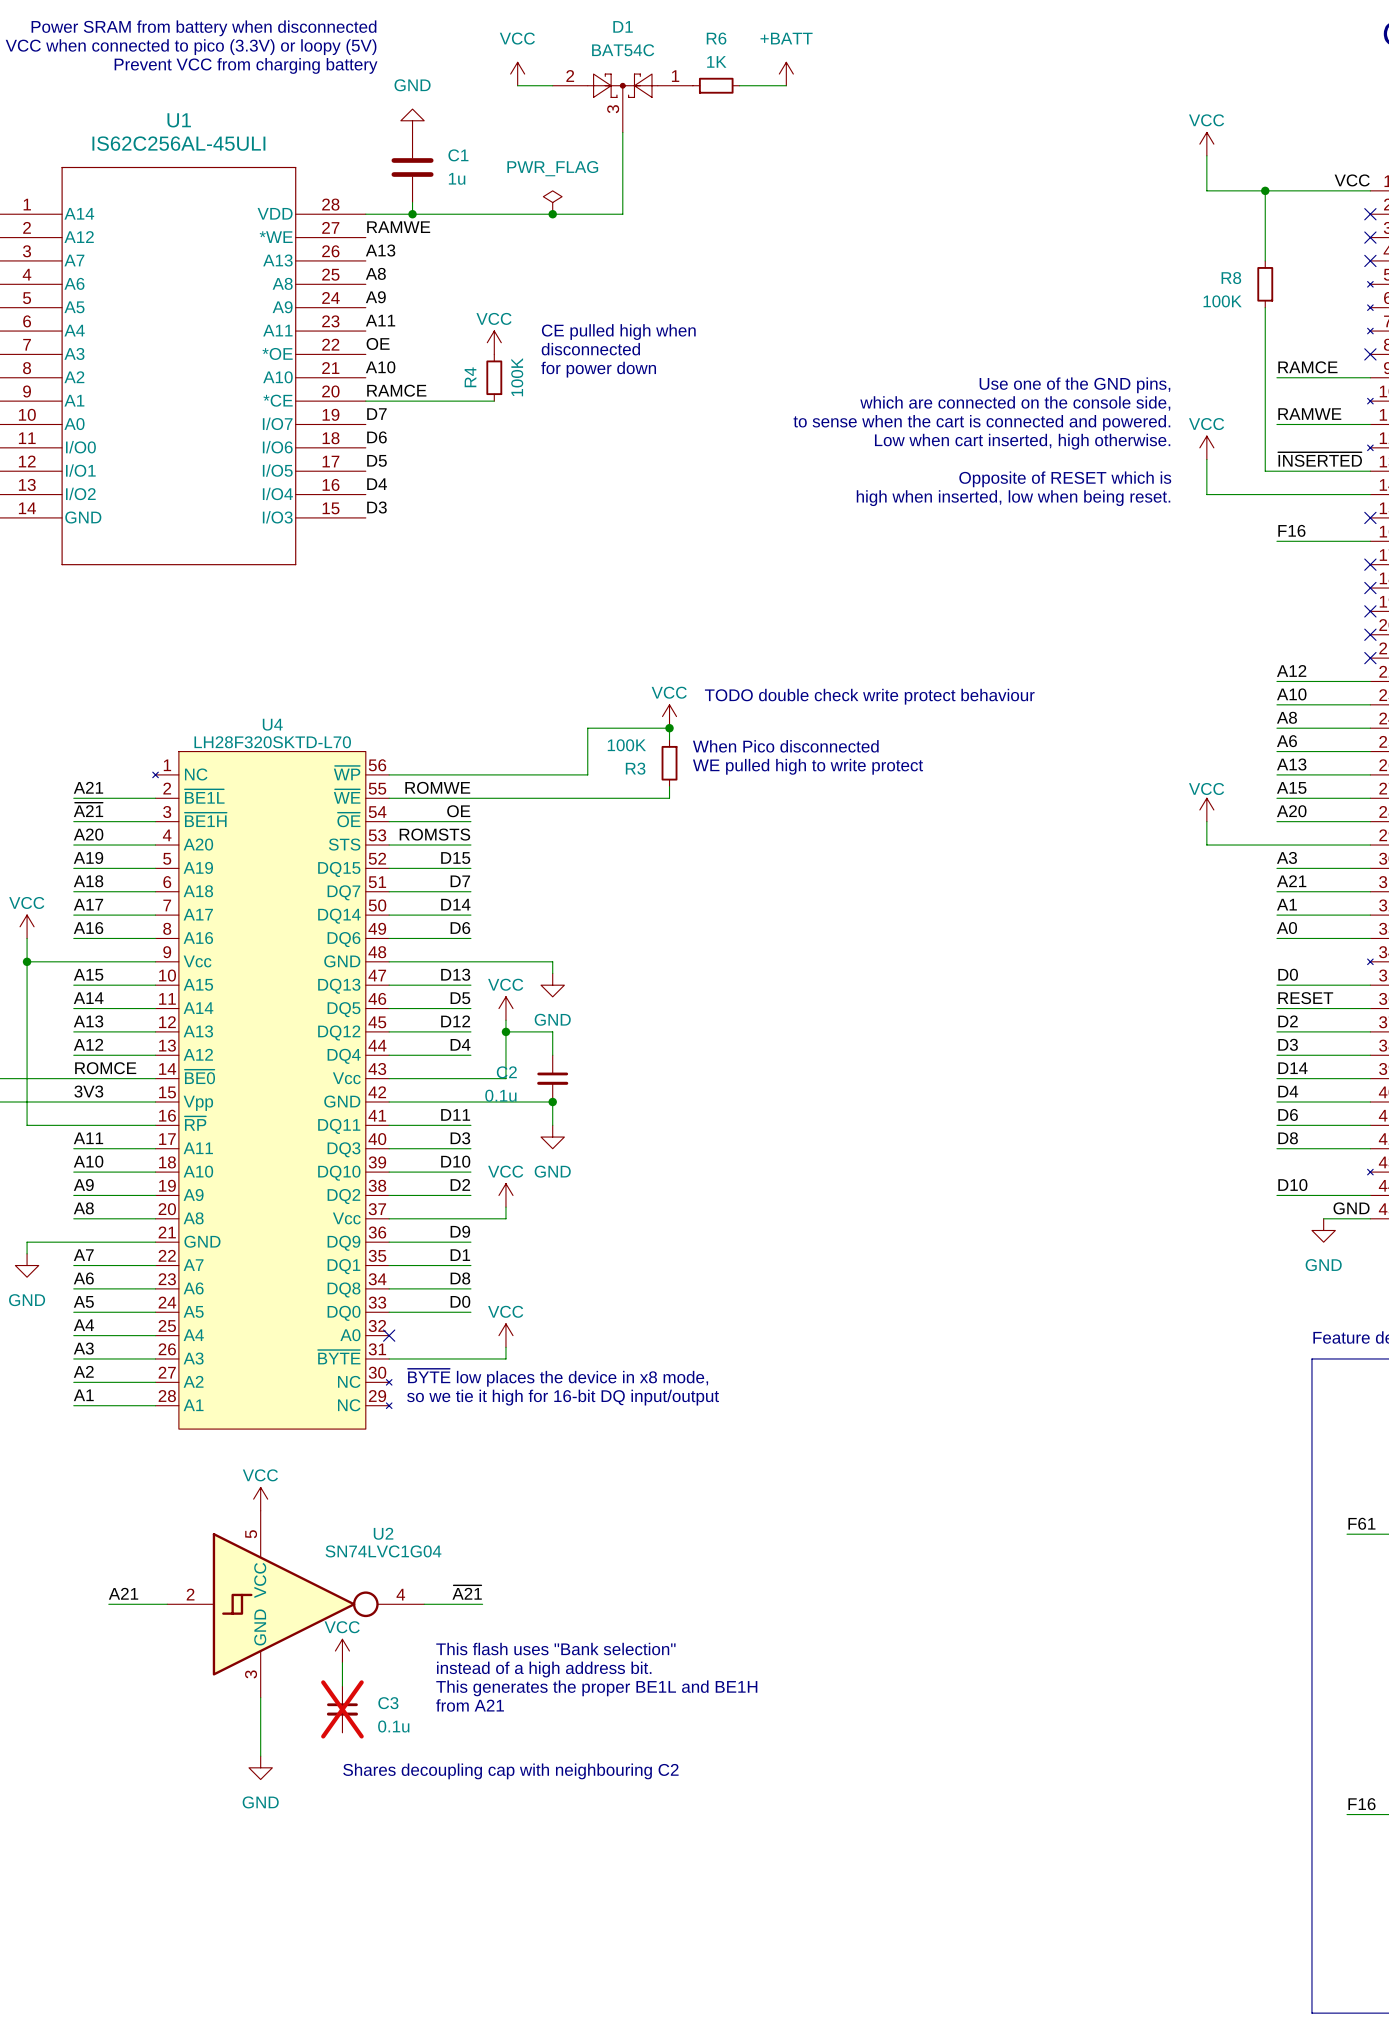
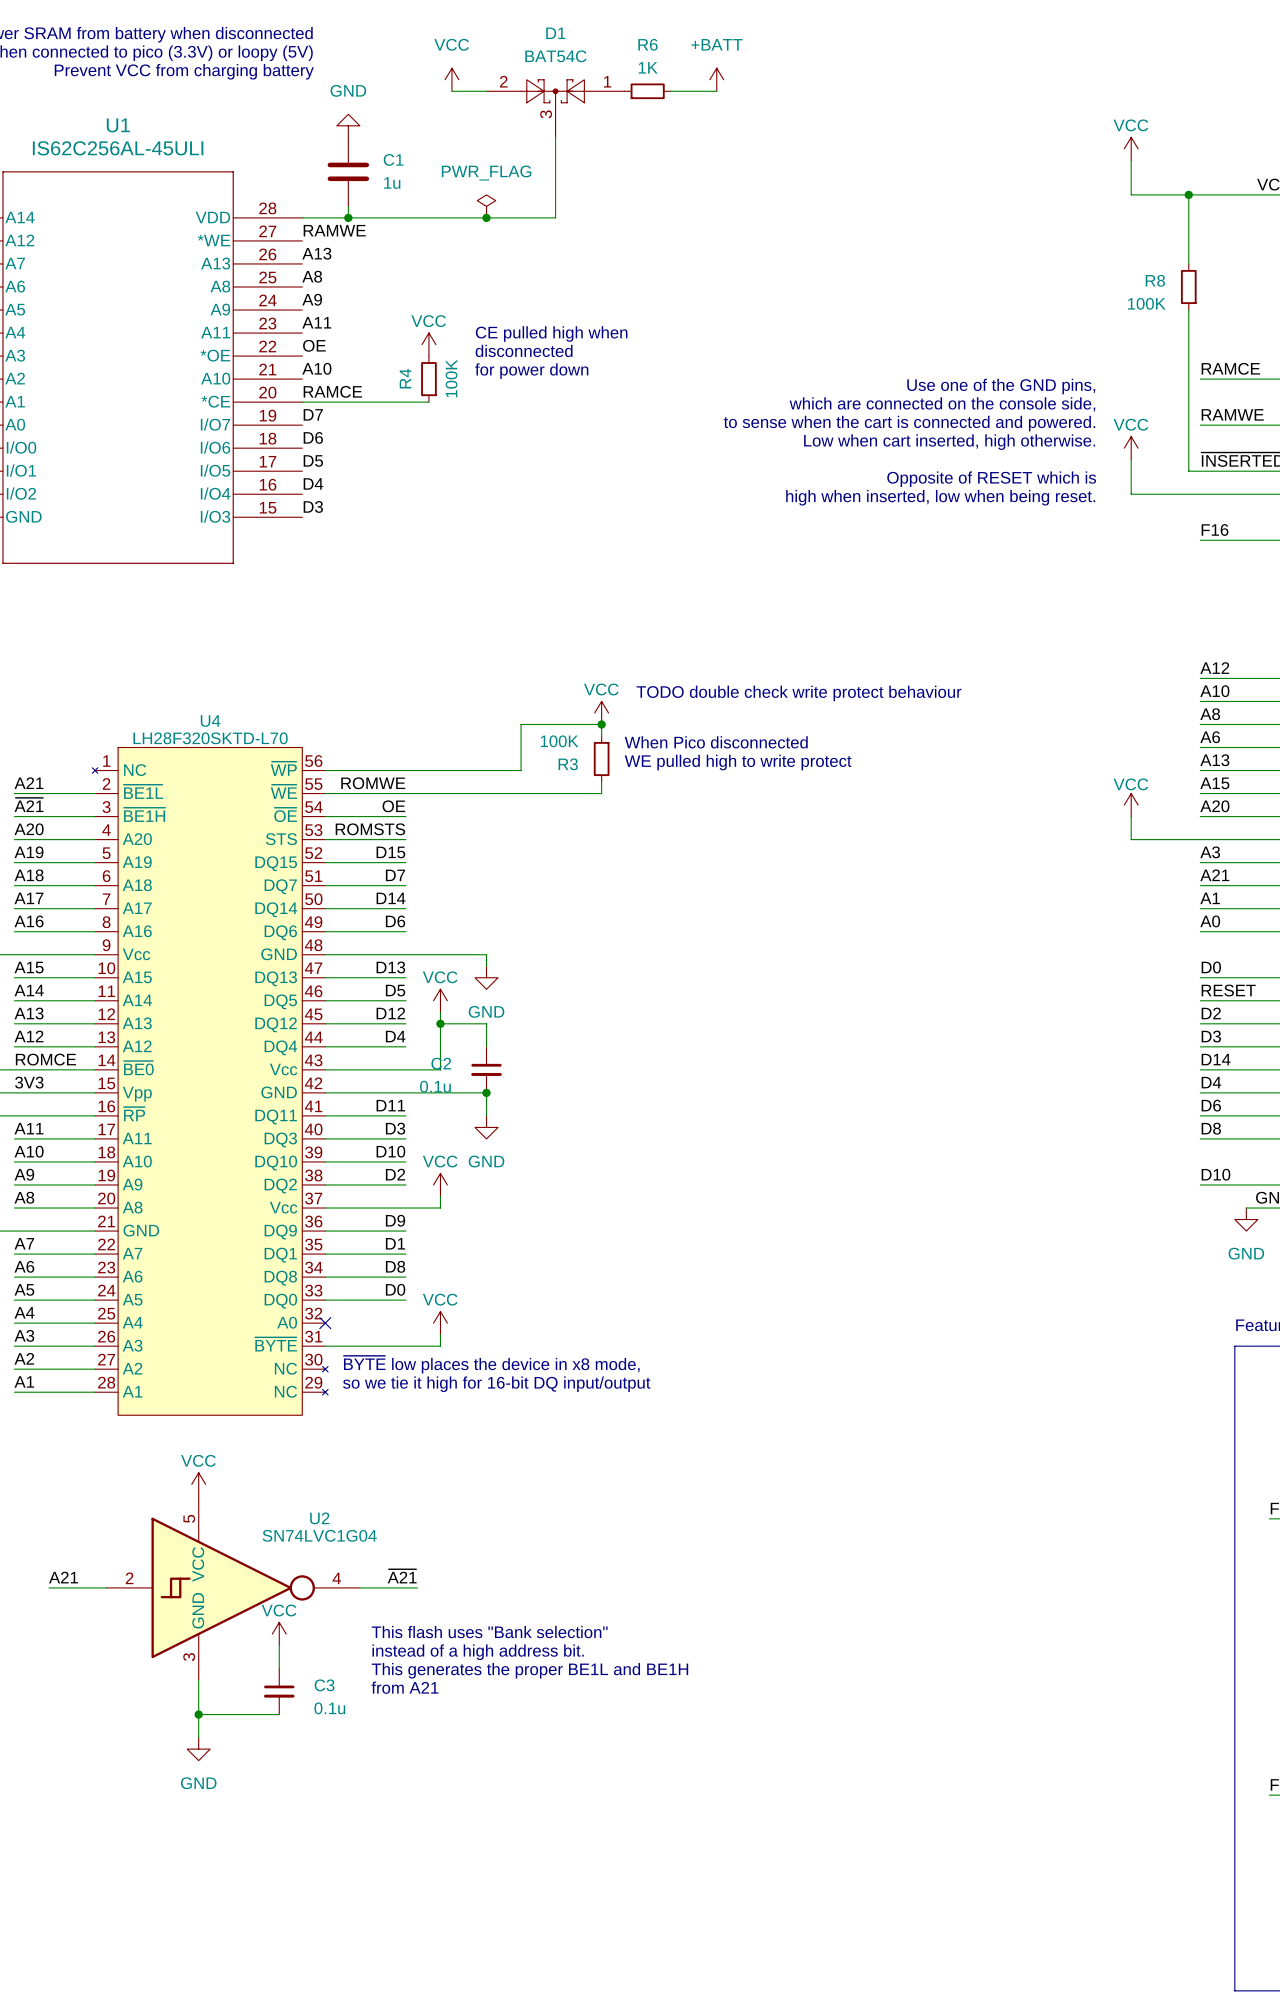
C3 do-not-place cross: (342, 1709) -> none
wire: none -> (198, 1714) (279, 1714)
junction: none -> (198, 1714)
text: Shares decoupling cap with neighbouring C2 (510, 1771) -> none

